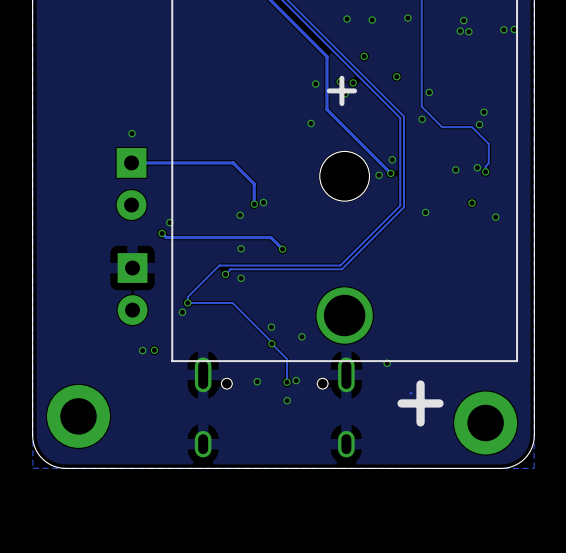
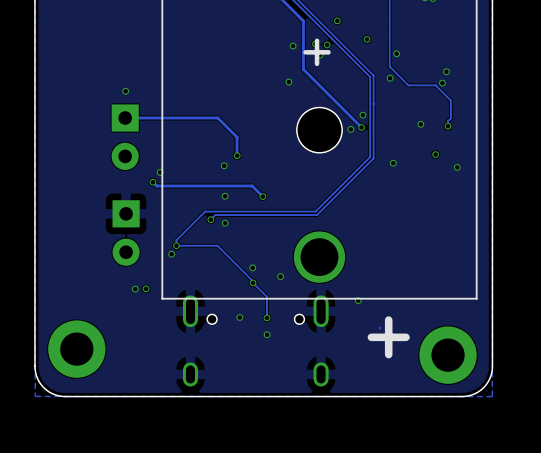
via: (477, 167) -> none
via: (263, 202) -> none
via: (296, 380) -> none

